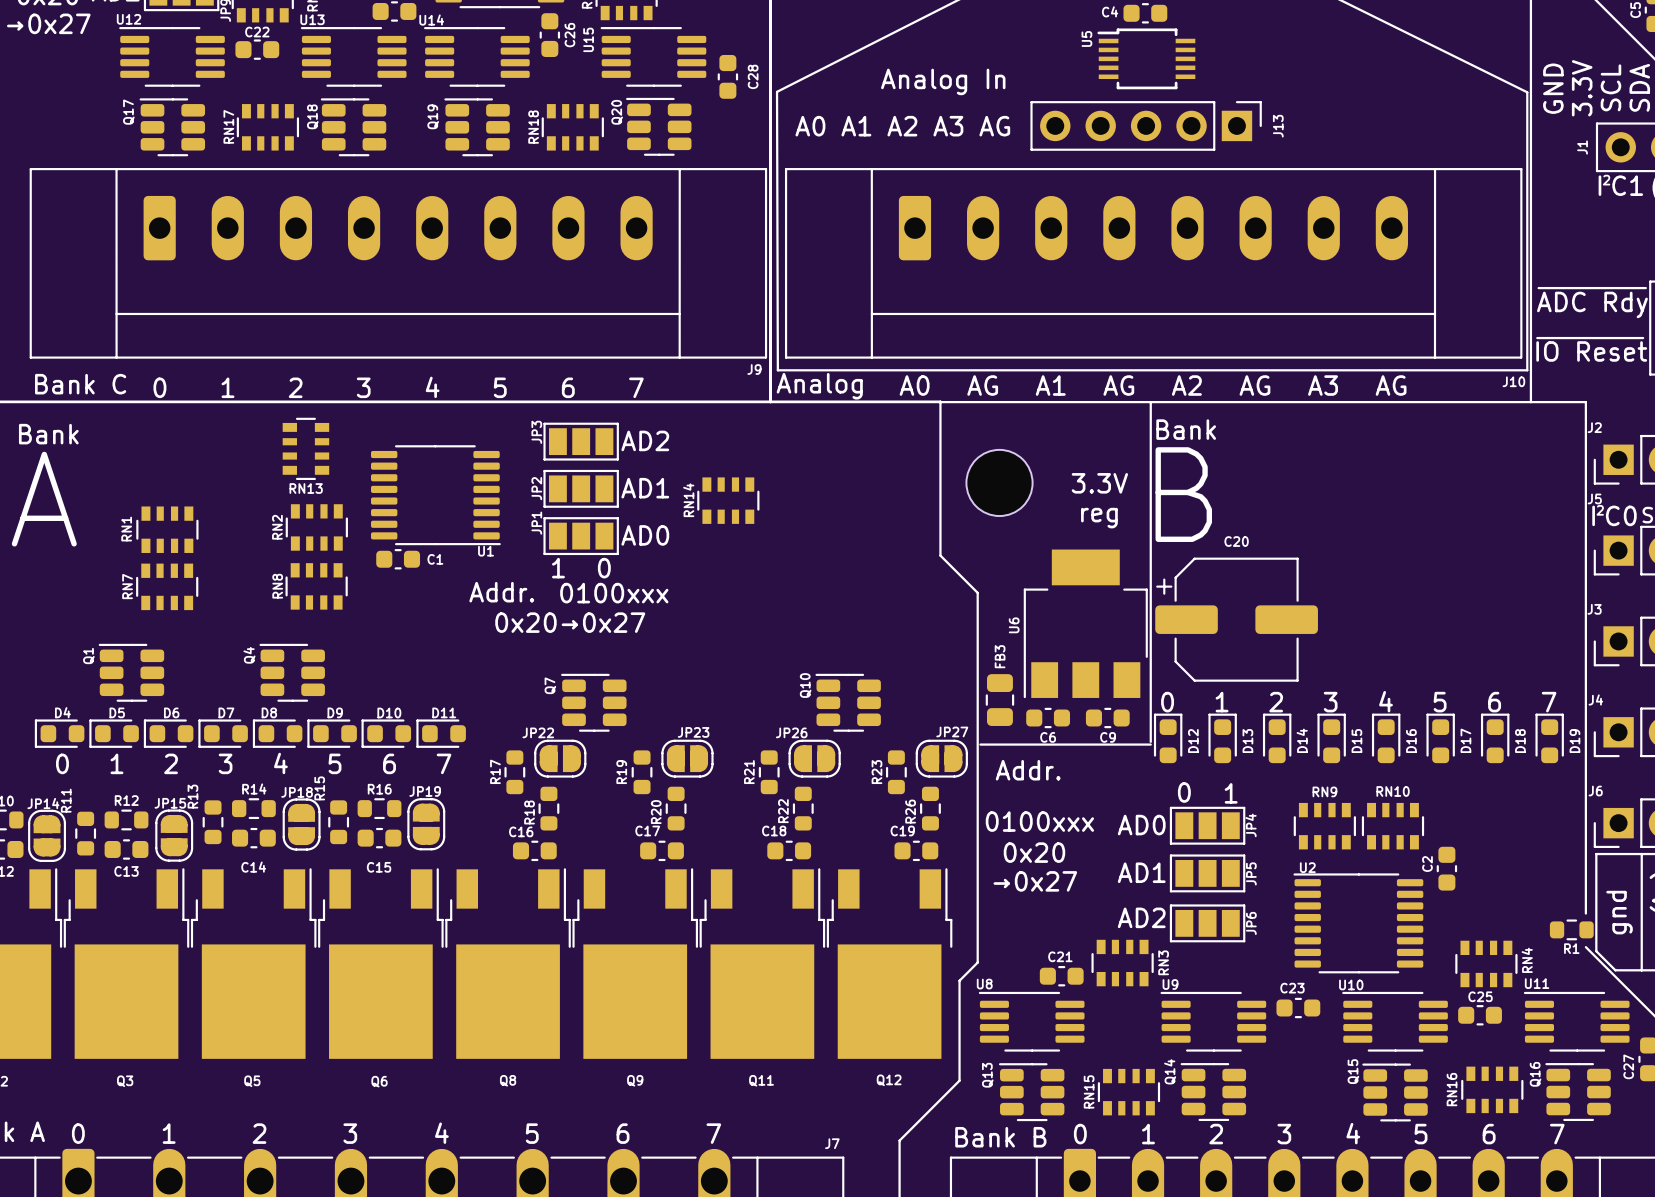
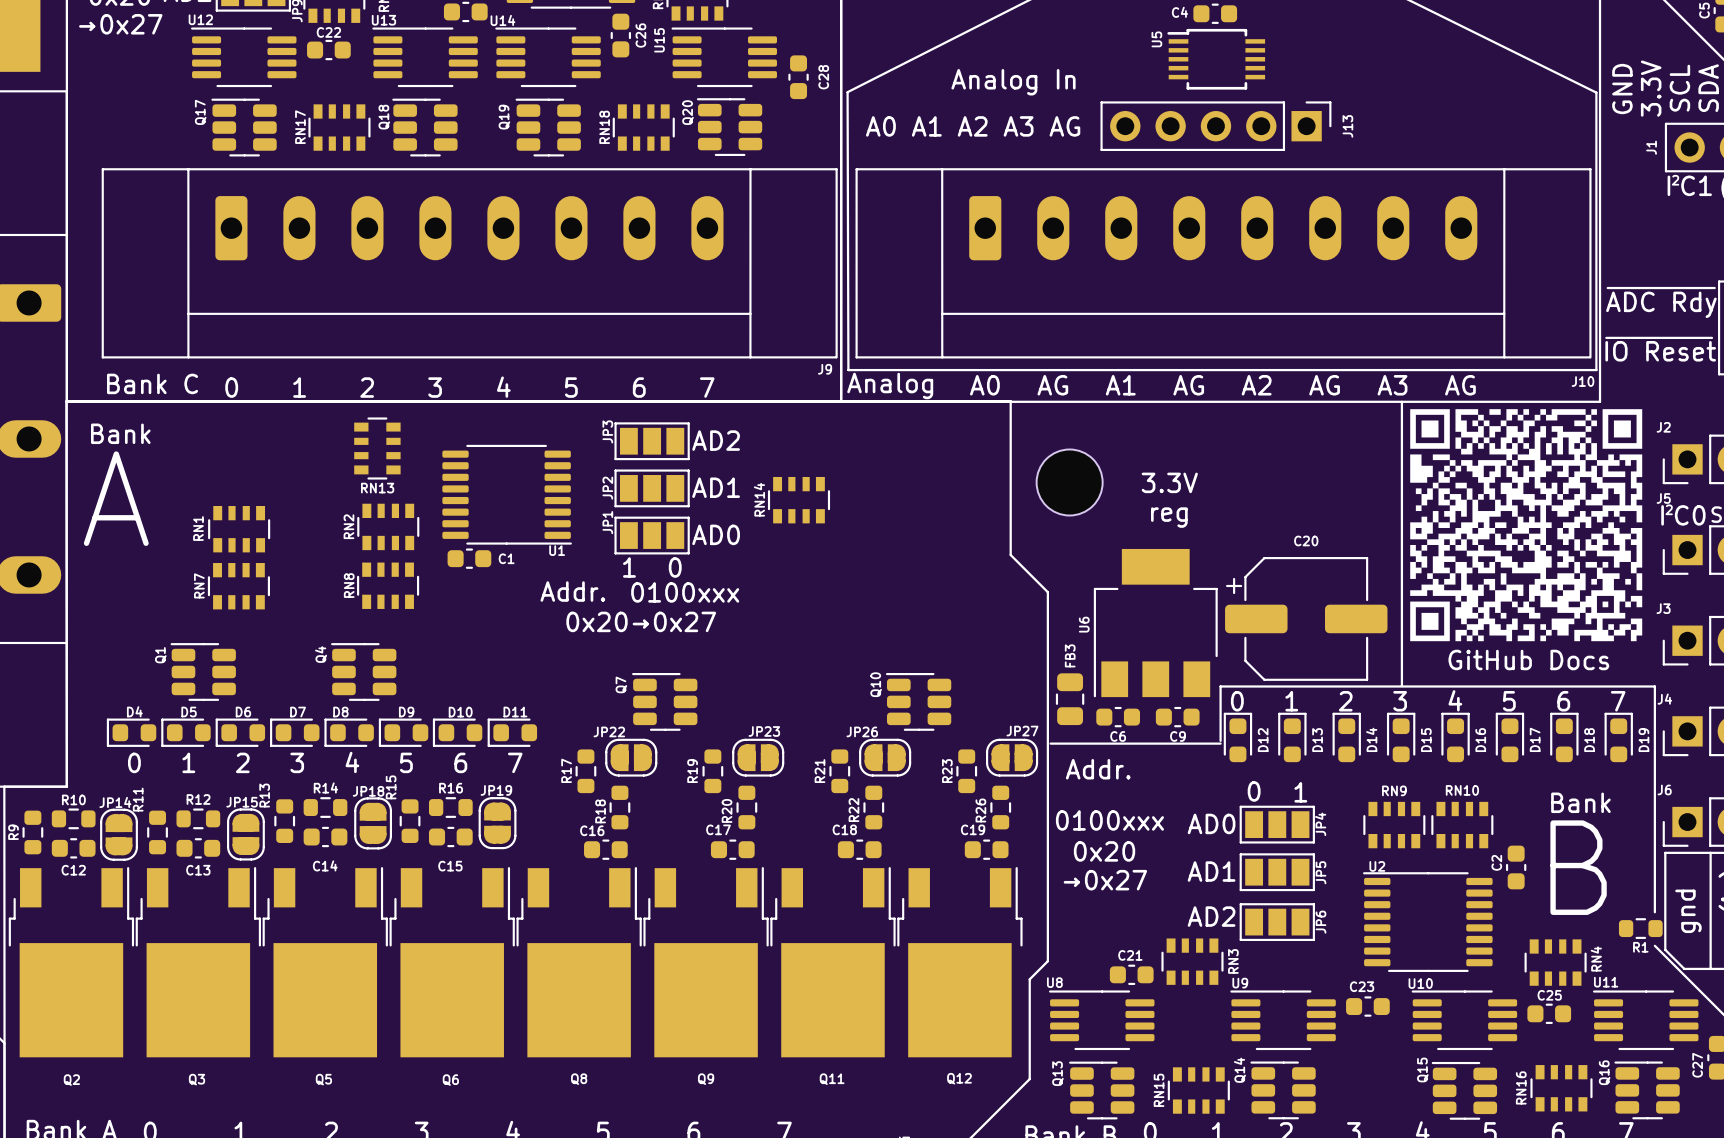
line: (1150, 402) (1150, 687) -> none
line: none -> (1401, 401) (1401, 686)
line: (1530, 402) (1585, 402) (1585, 687) -> (1220, 686) (1654, 686)
drawing: none -> [1410, 409, 1643, 642]
text: Bank (1186, 429) -> none
text: B (1183, 494) -> none
text: none -> GitHub Docs (1528, 659)
text: none -> Bank (1580, 802)
text: none -> B (1578, 867)

